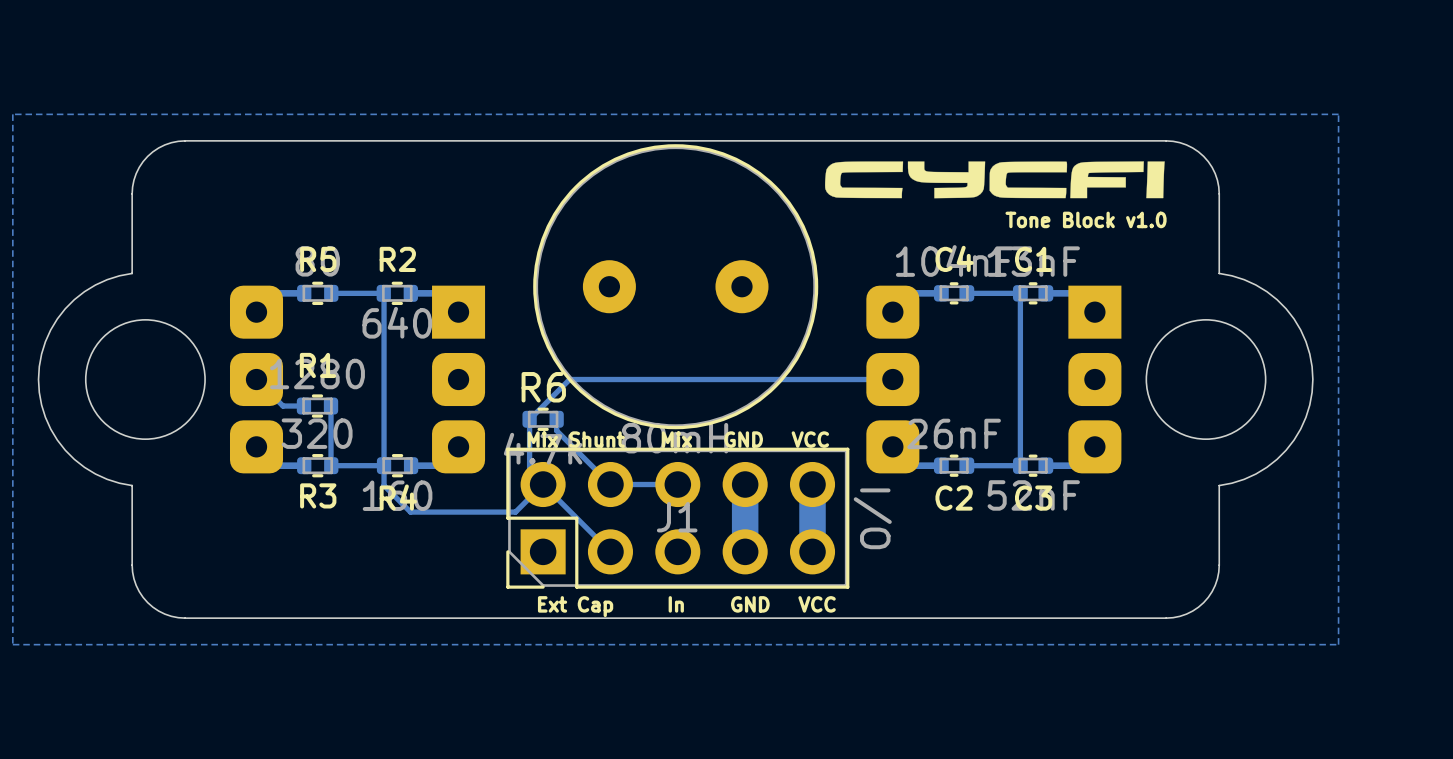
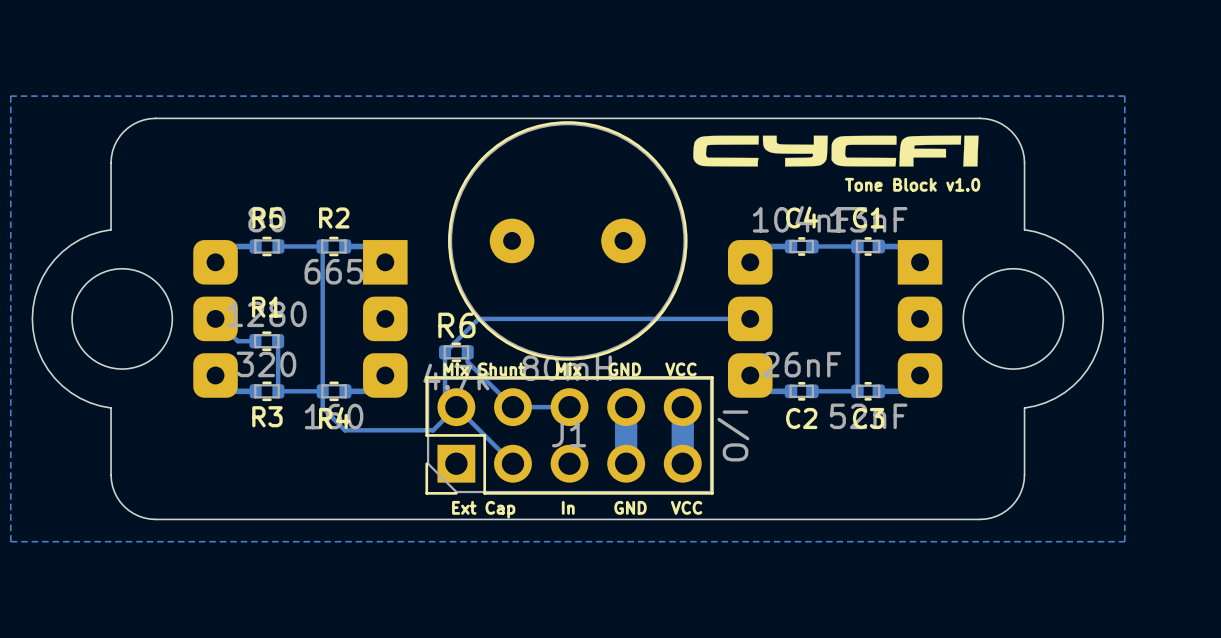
R2 value: 640 (397, 322) -> 665 (333, 271)

